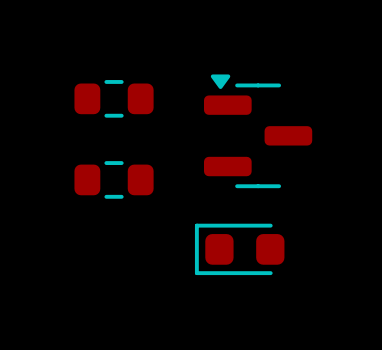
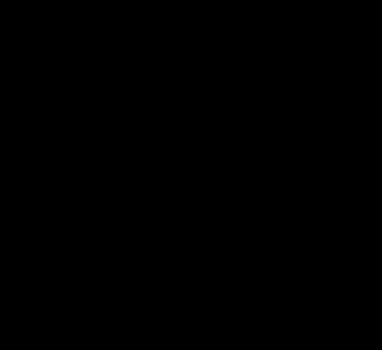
part: (114, 98) -> none
part: (258, 131) -> none
part: (114, 179) -> none
part: (239, 249) -> none

